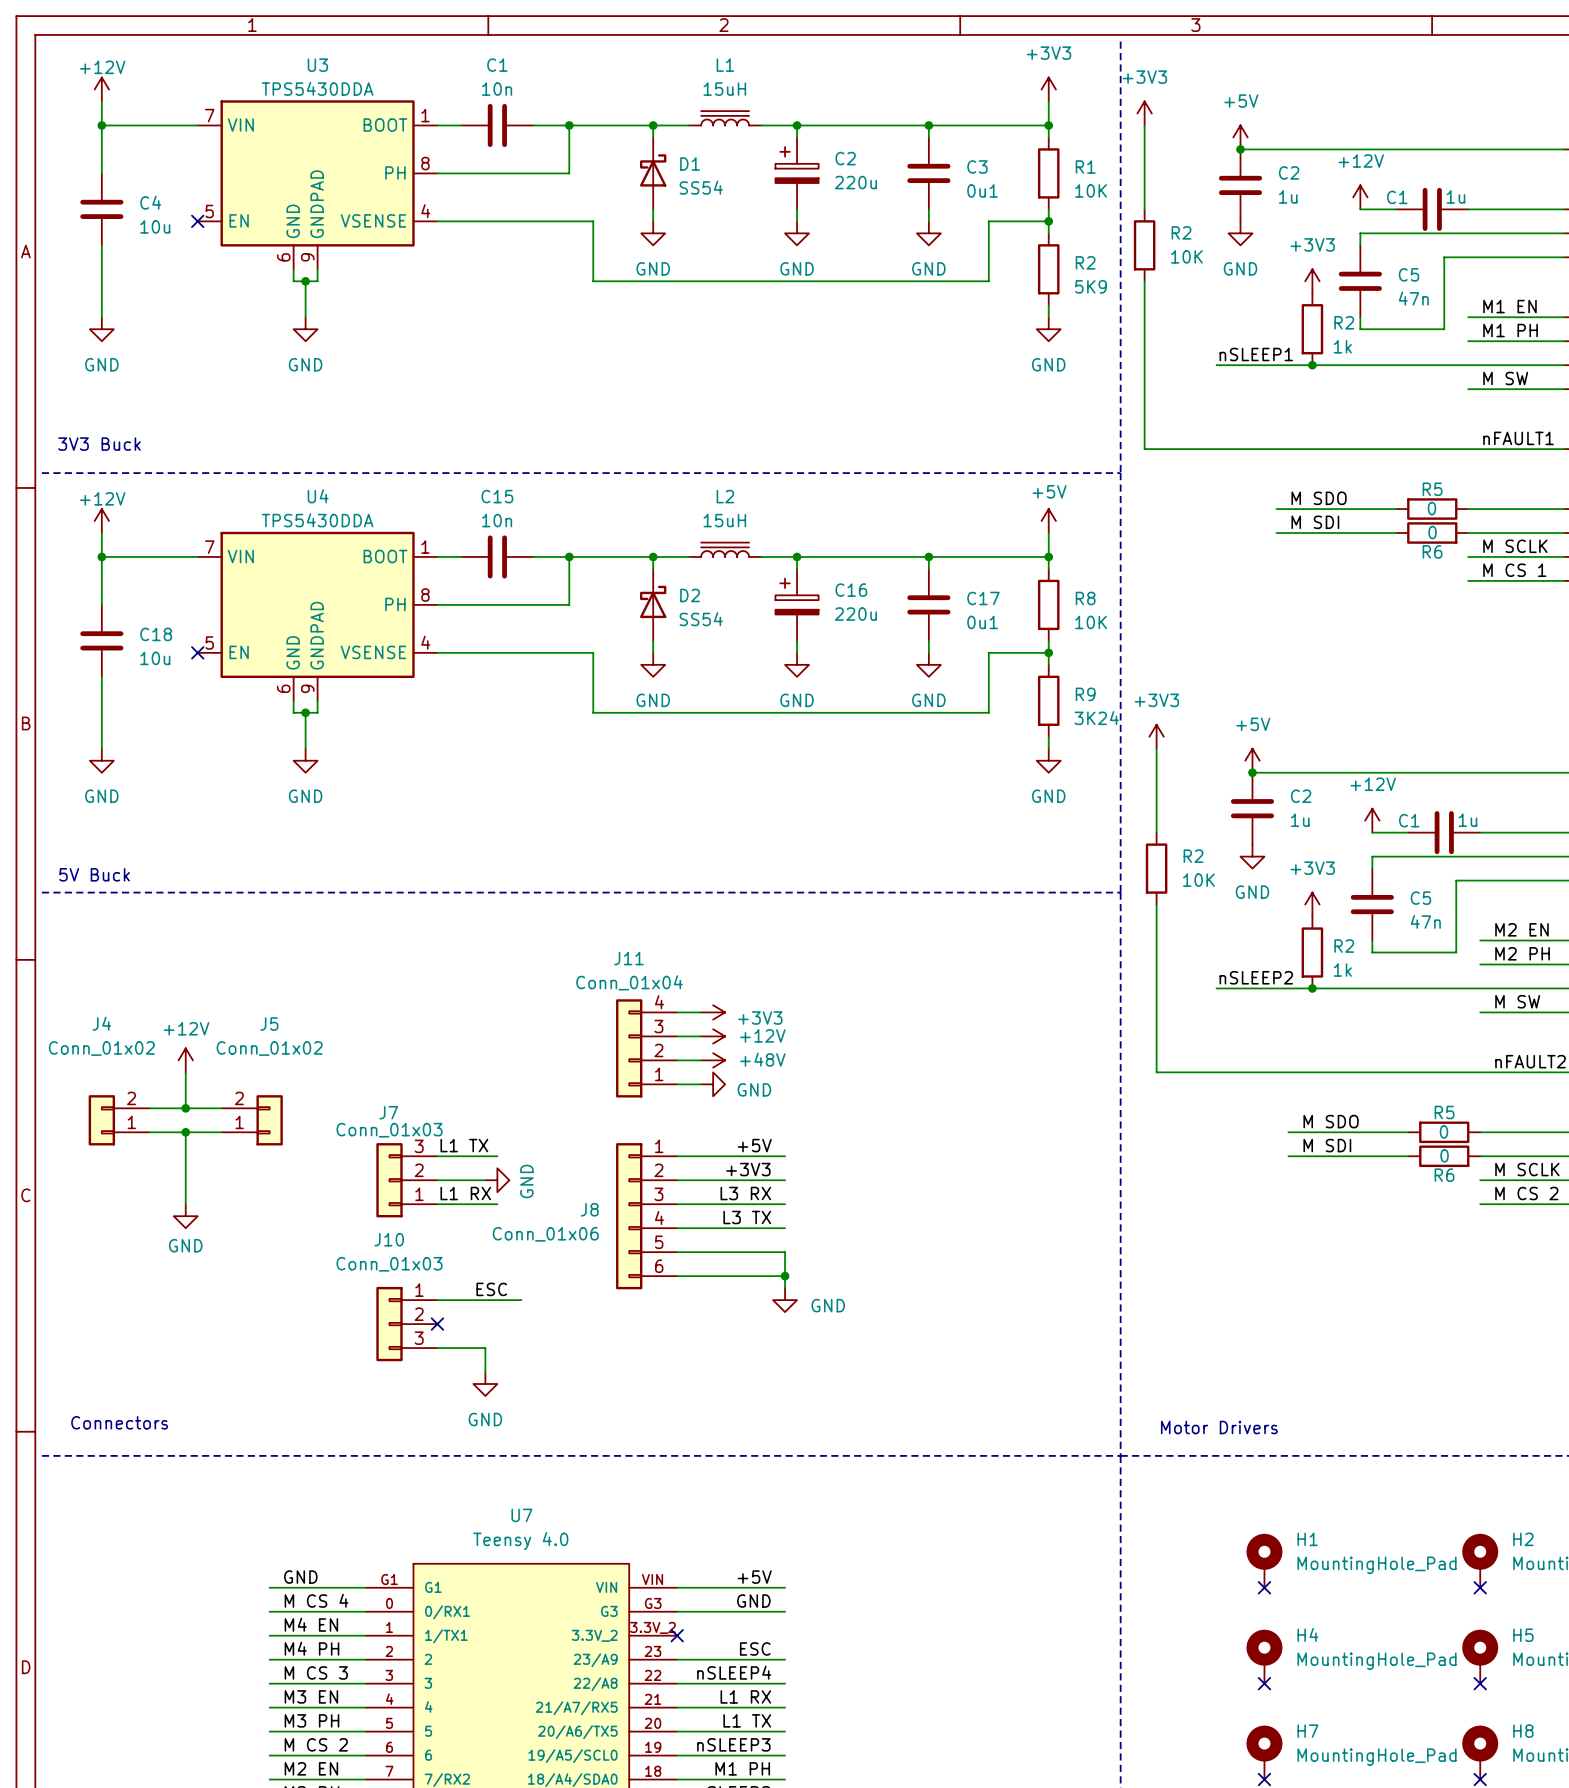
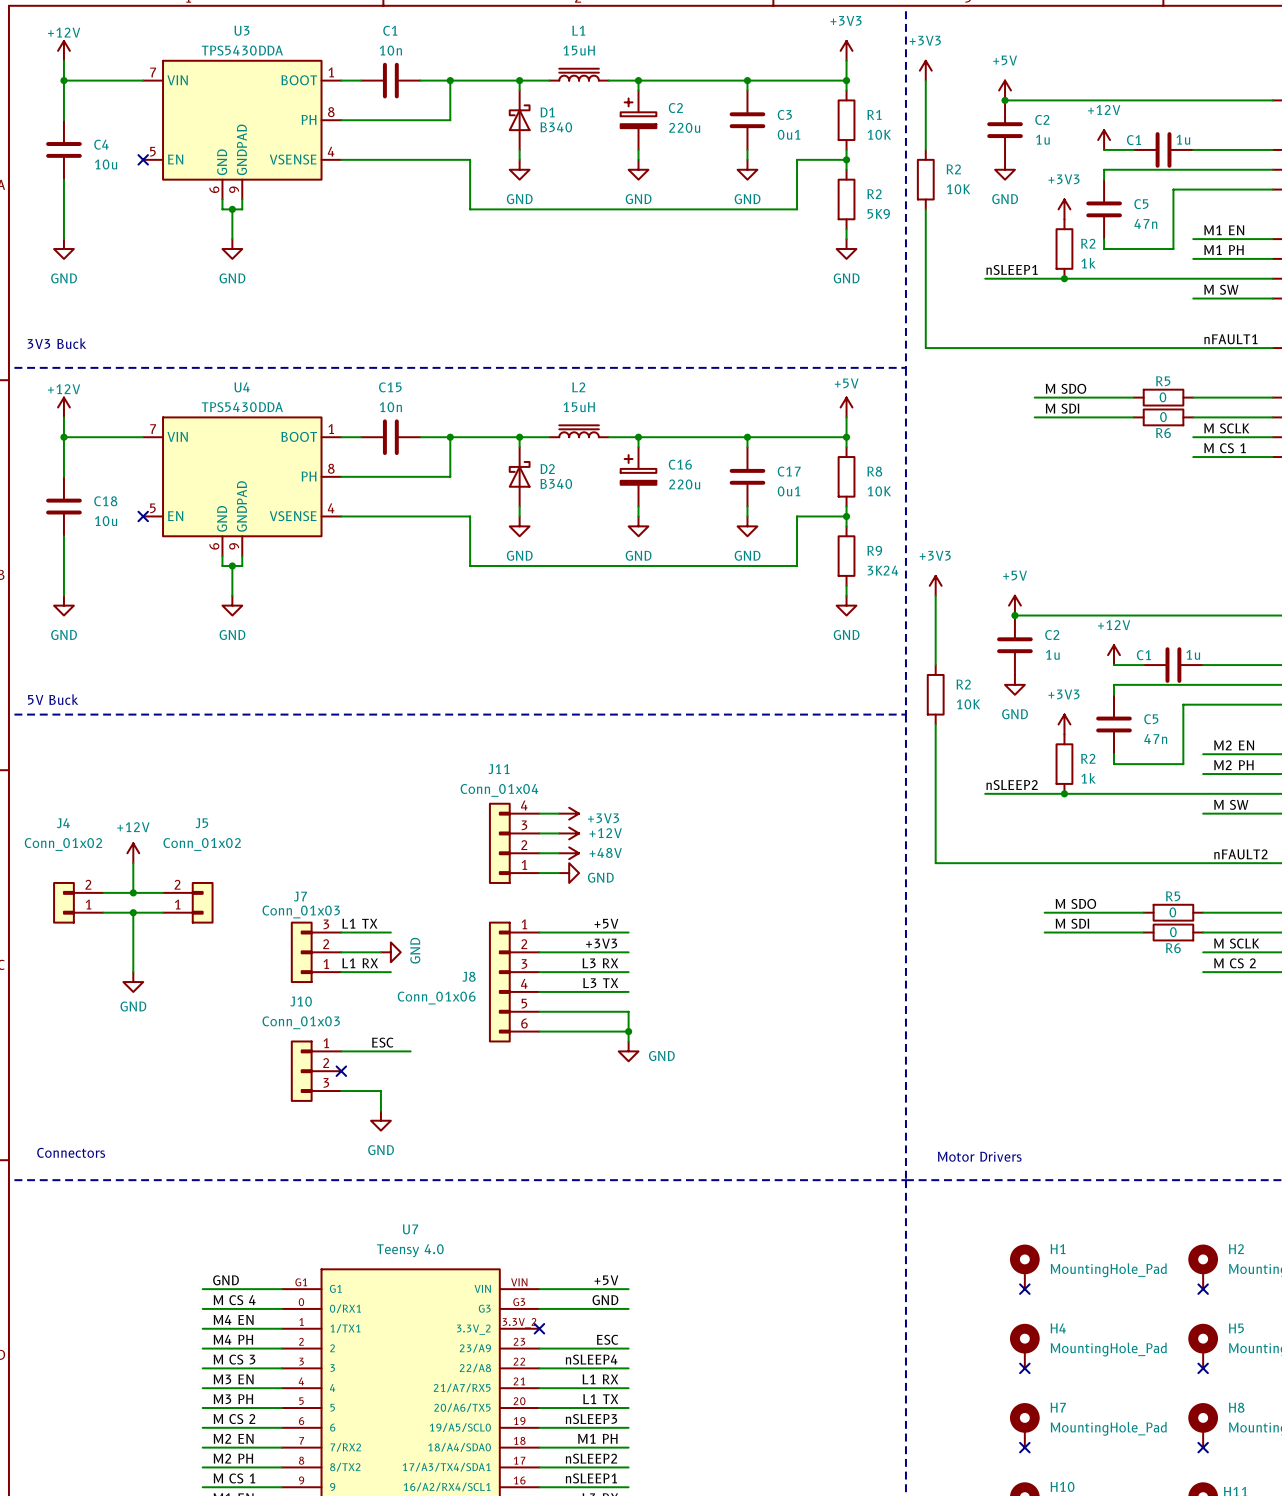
D1 value: SS54 (701, 187) -> B340 (556, 127)
D2 value: SS54 (701, 619) -> B340 (556, 483)

